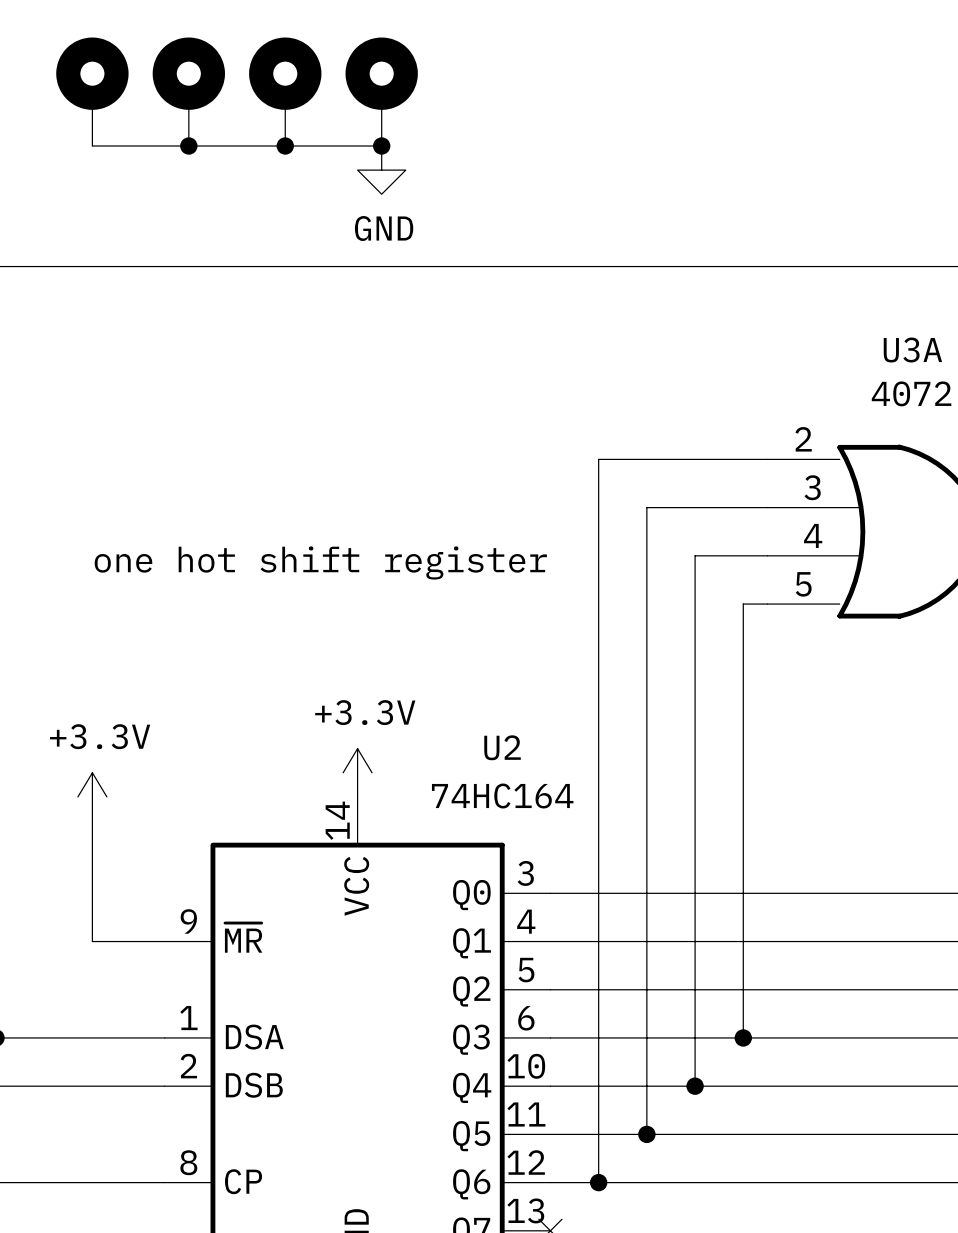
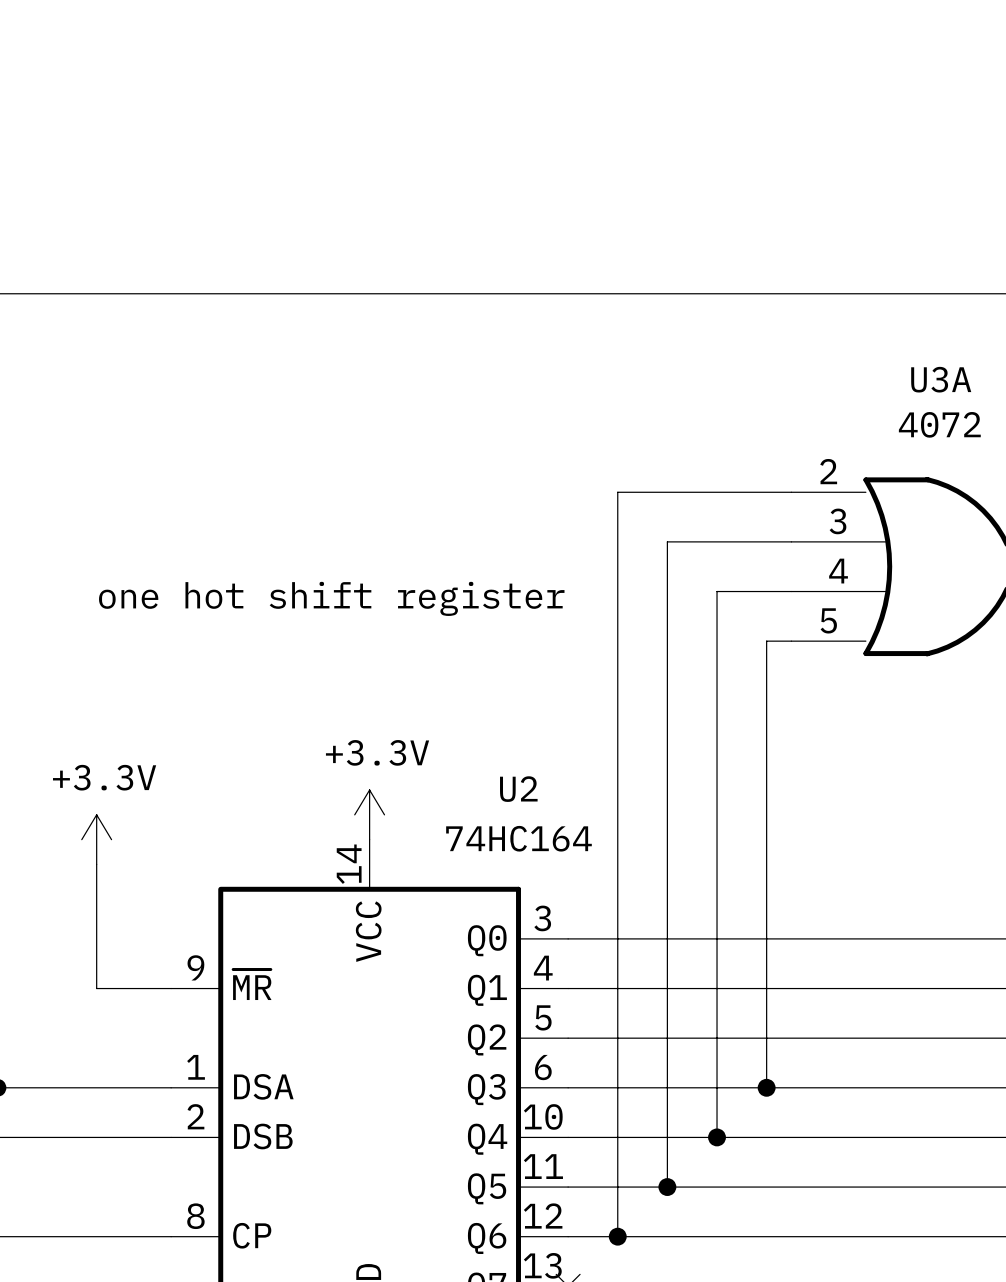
part: (92, 91) -> none
part: (188, 91) -> none
part: (285, 91) -> none
part: (381, 91) -> none
wire: (92, 146) (381, 146) -> none
junction: (188, 146) -> none
junction: (285, 146) -> none
junction: (381, 146) -> none
power symbol: GND (381, 170) -> none

